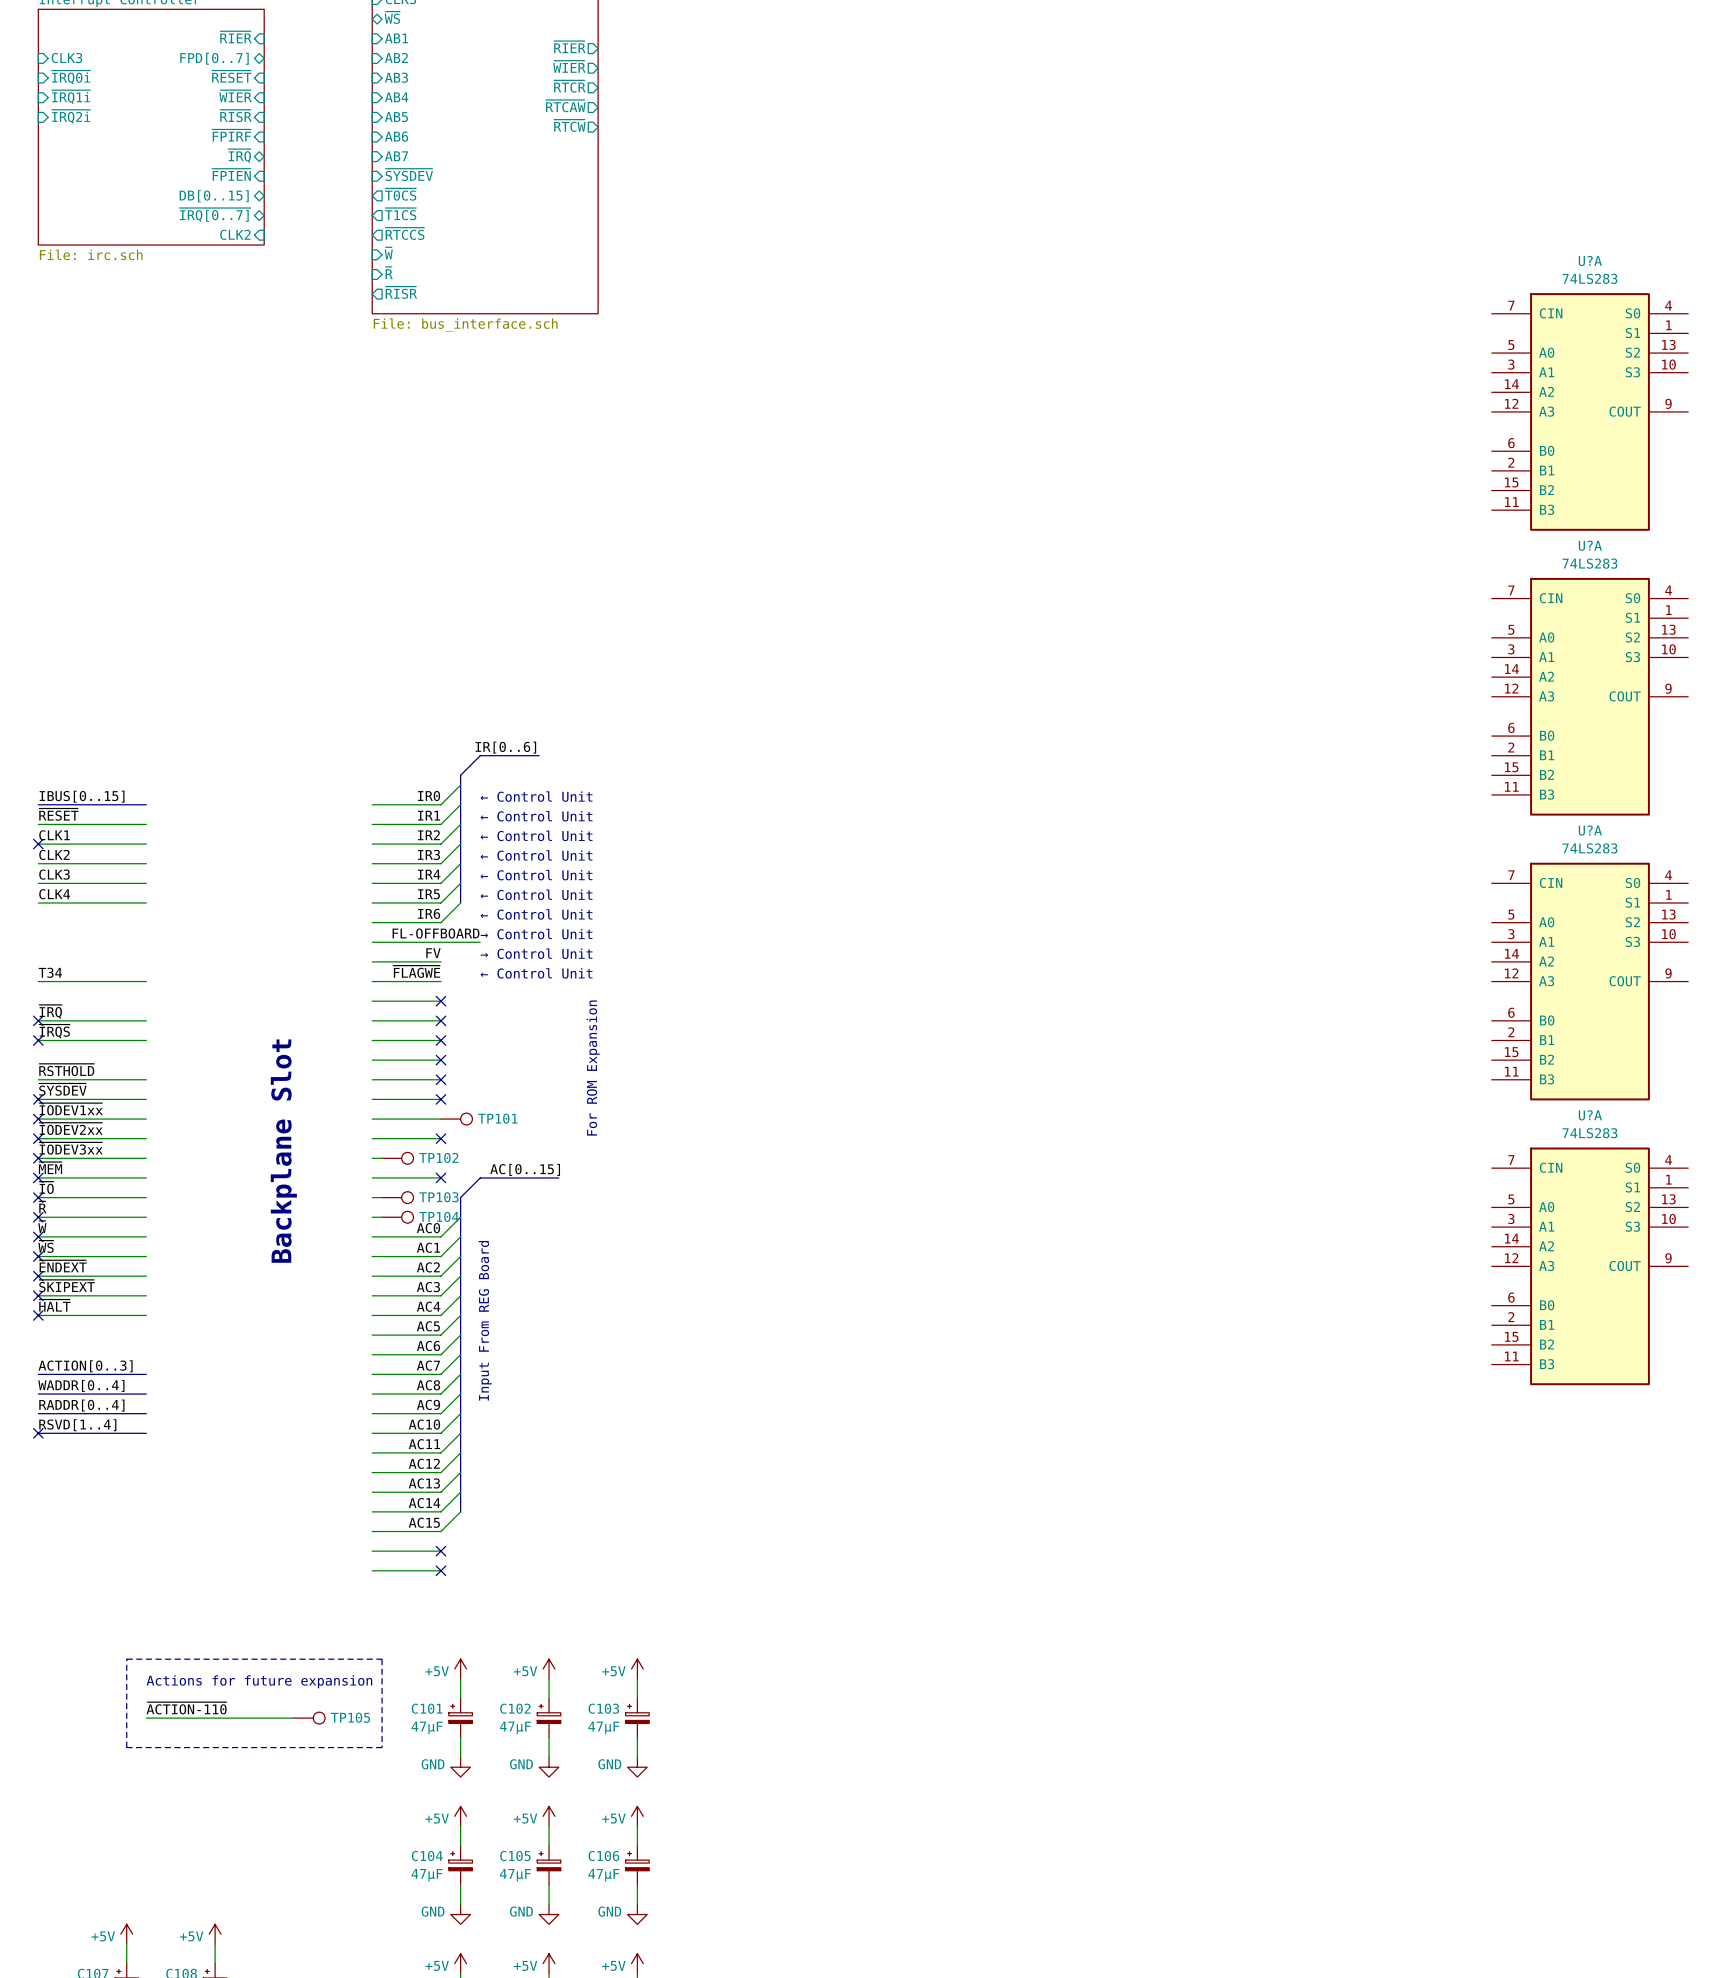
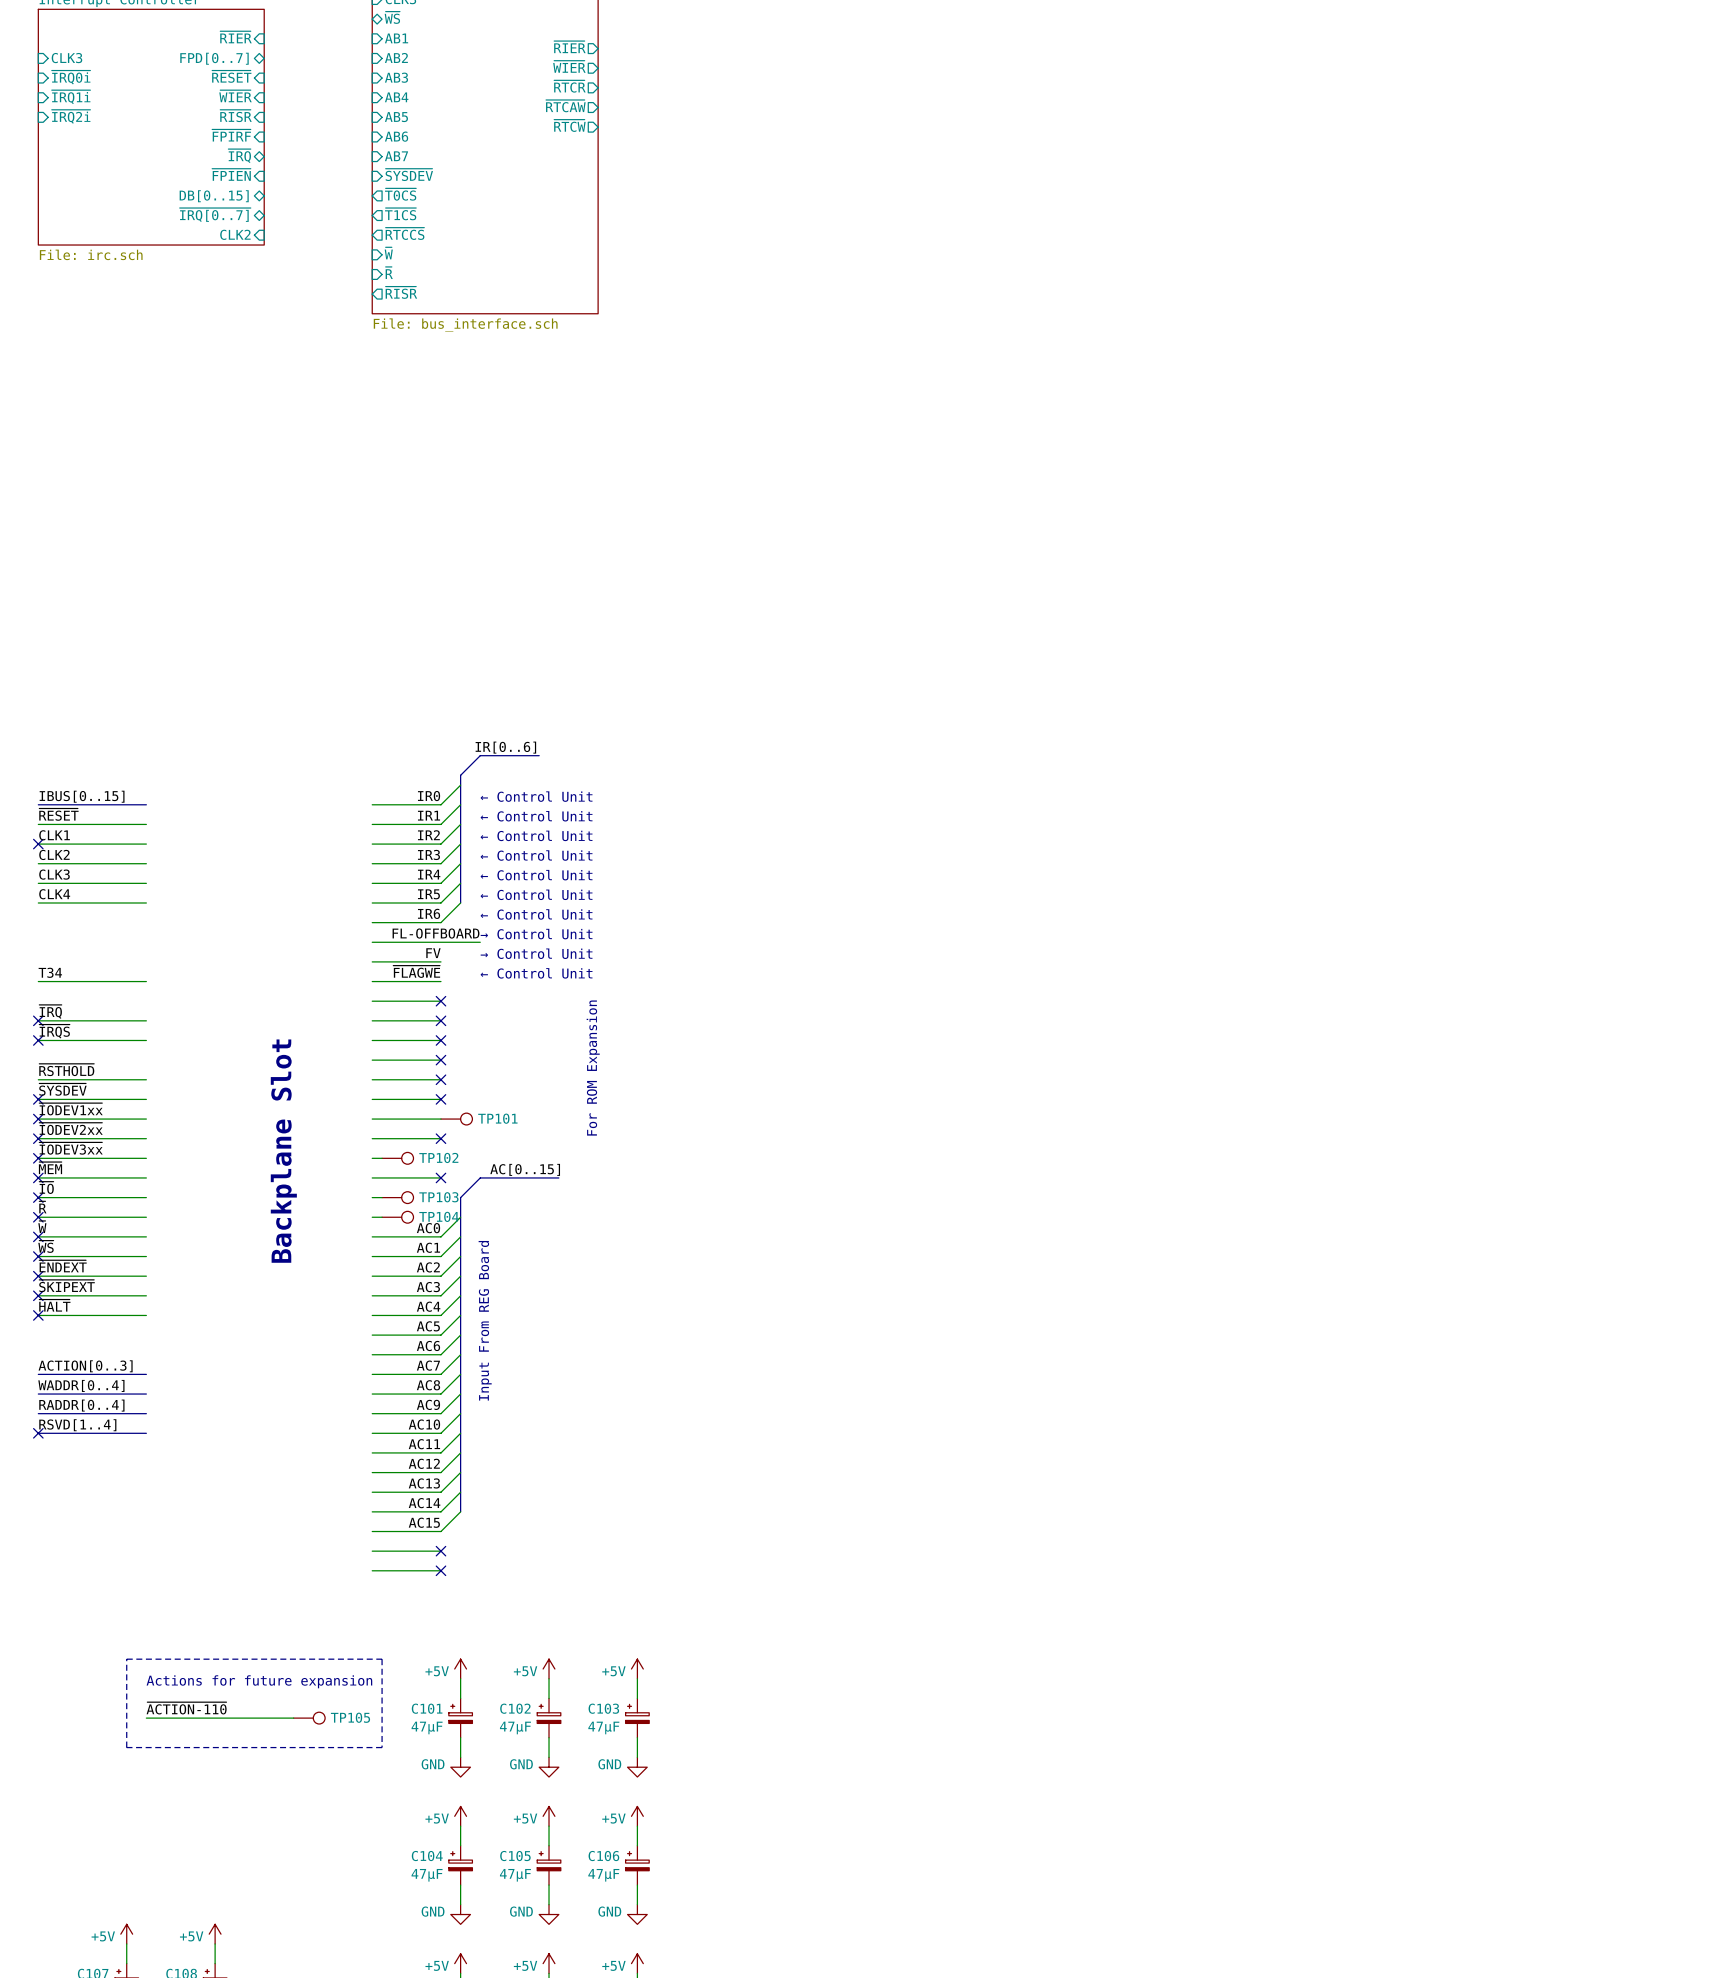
U?A: 74LS283 (1589, 411) -> none
U?A: 74LS283 (1589, 696) -> none
U?A: 74LS283 (1589, 981) -> none
U?A: 74LS283 (1589, 1266) -> none

